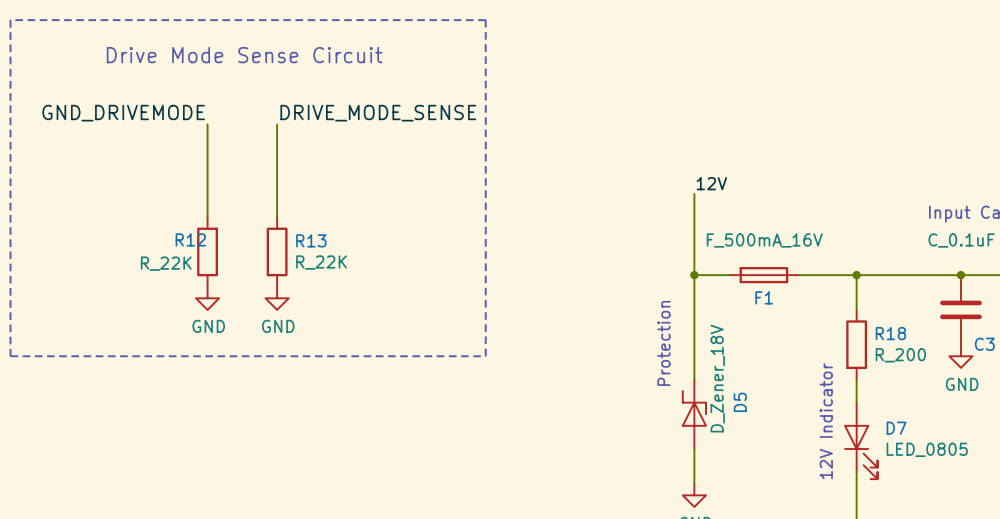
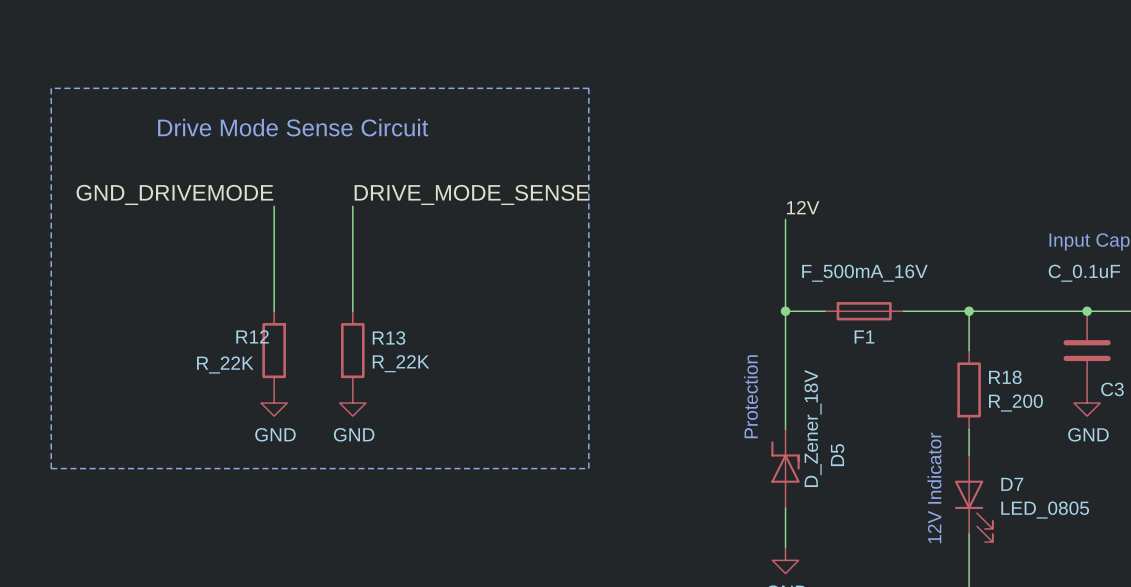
line: (10, 20) (485, 20) (485, 356) (10, 356) (10, 20) -> (51, 88) (51, 468) (588, 468) (588, 88) (51, 88)
text position: Drive Mode Sense Circuit (244, 55) -> Drive Mode Sense Circuit (293, 127)
label position: GND_DRIVEMODE (123, 113) -> GND_DRIVEMODE (174, 194)
label position: DRIVE_MODE_SENSE (378, 113) -> DRIVE_MODE_SENSE (471, 194)
wire: (207, 124) (207, 217) -> (274, 206) (274, 311)
wire: (277, 124) (277, 217) -> (352, 206) (352, 311)
R12 position: (207, 251) -> (274, 350)
R13 position: (277, 251) -> (352, 350)
power symbol: GND (207, 298) -> none
power symbol: GND (277, 298) -> none
power symbol: none -> GND (274, 403)
power symbol: none -> GND (352, 403)

